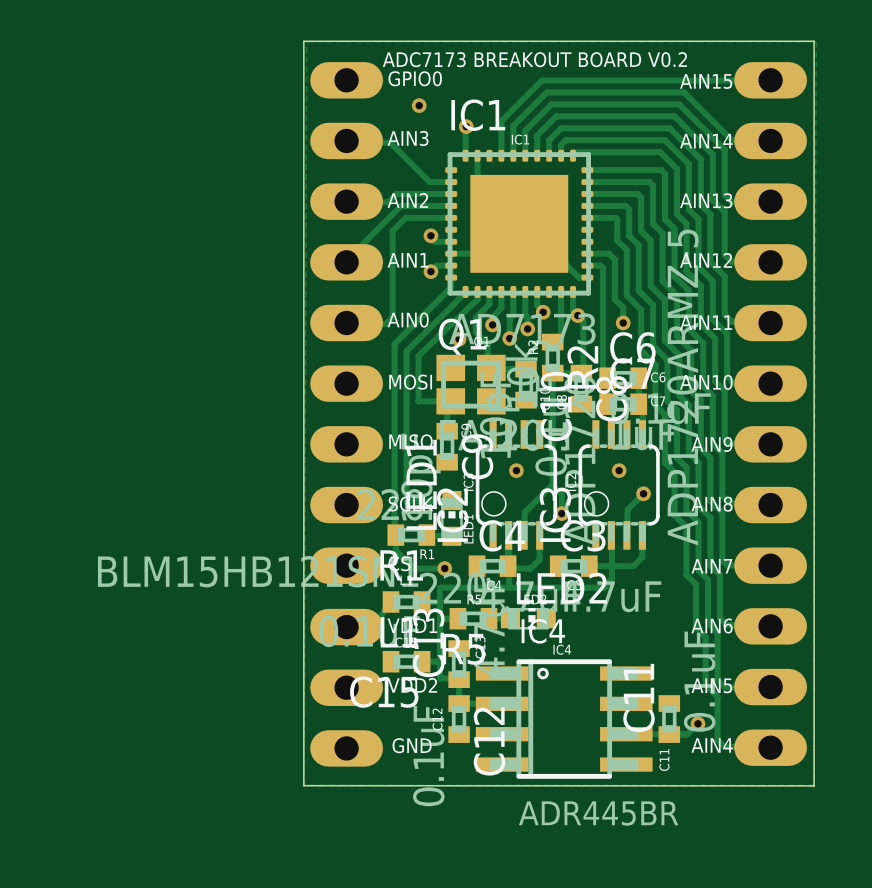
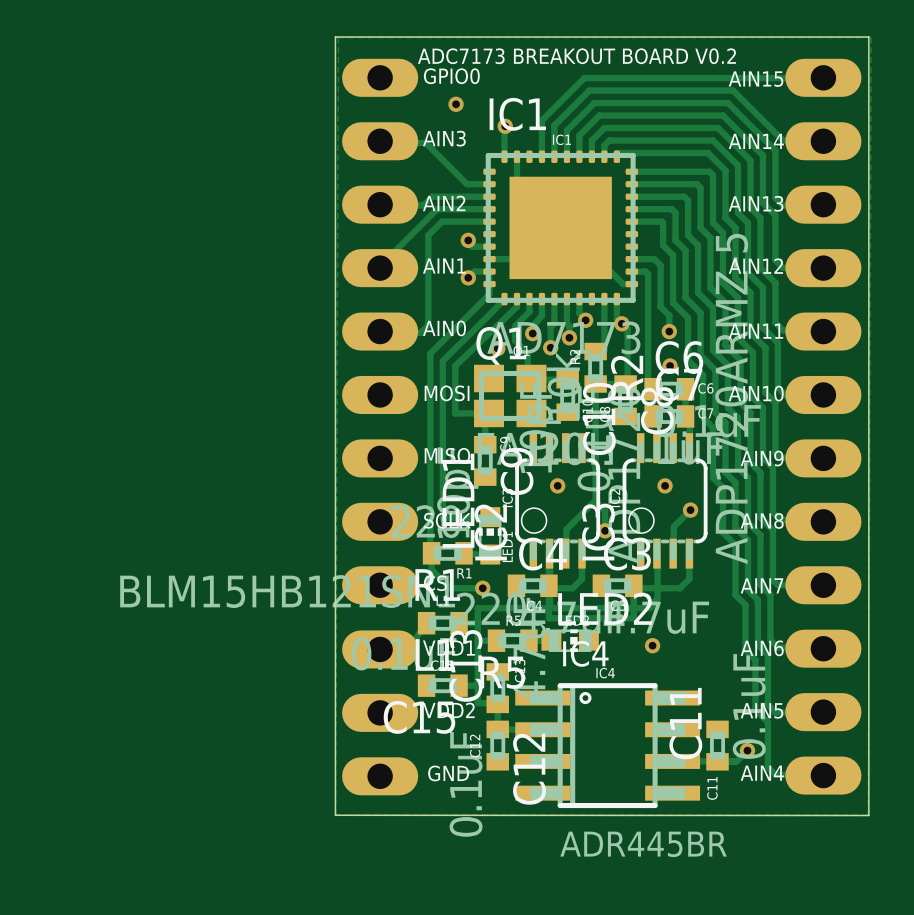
via: none -> (670, 366)
track: (642, 557) (633, 566) (589, 566) -> (689, 576) (689, 578) (680, 588) (633, 588) (633, 618) (548, 618) (548, 585)
via: none -> (652, 645)

